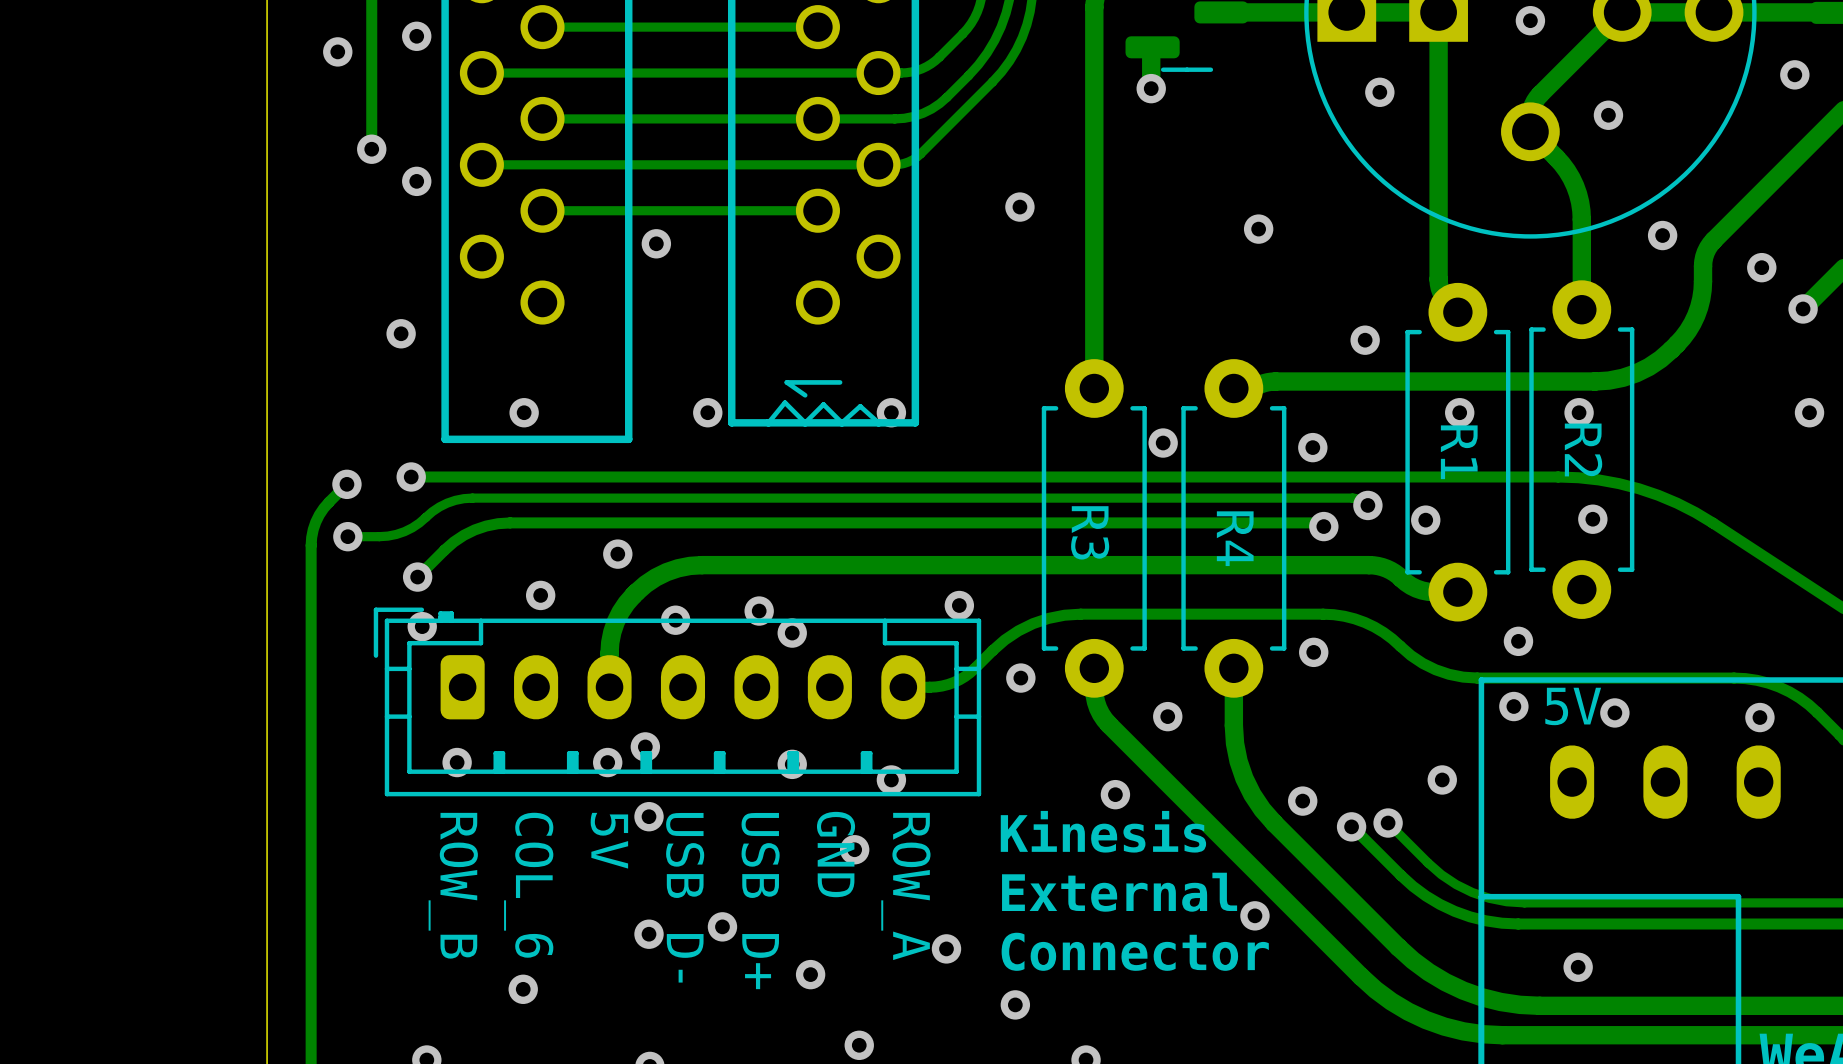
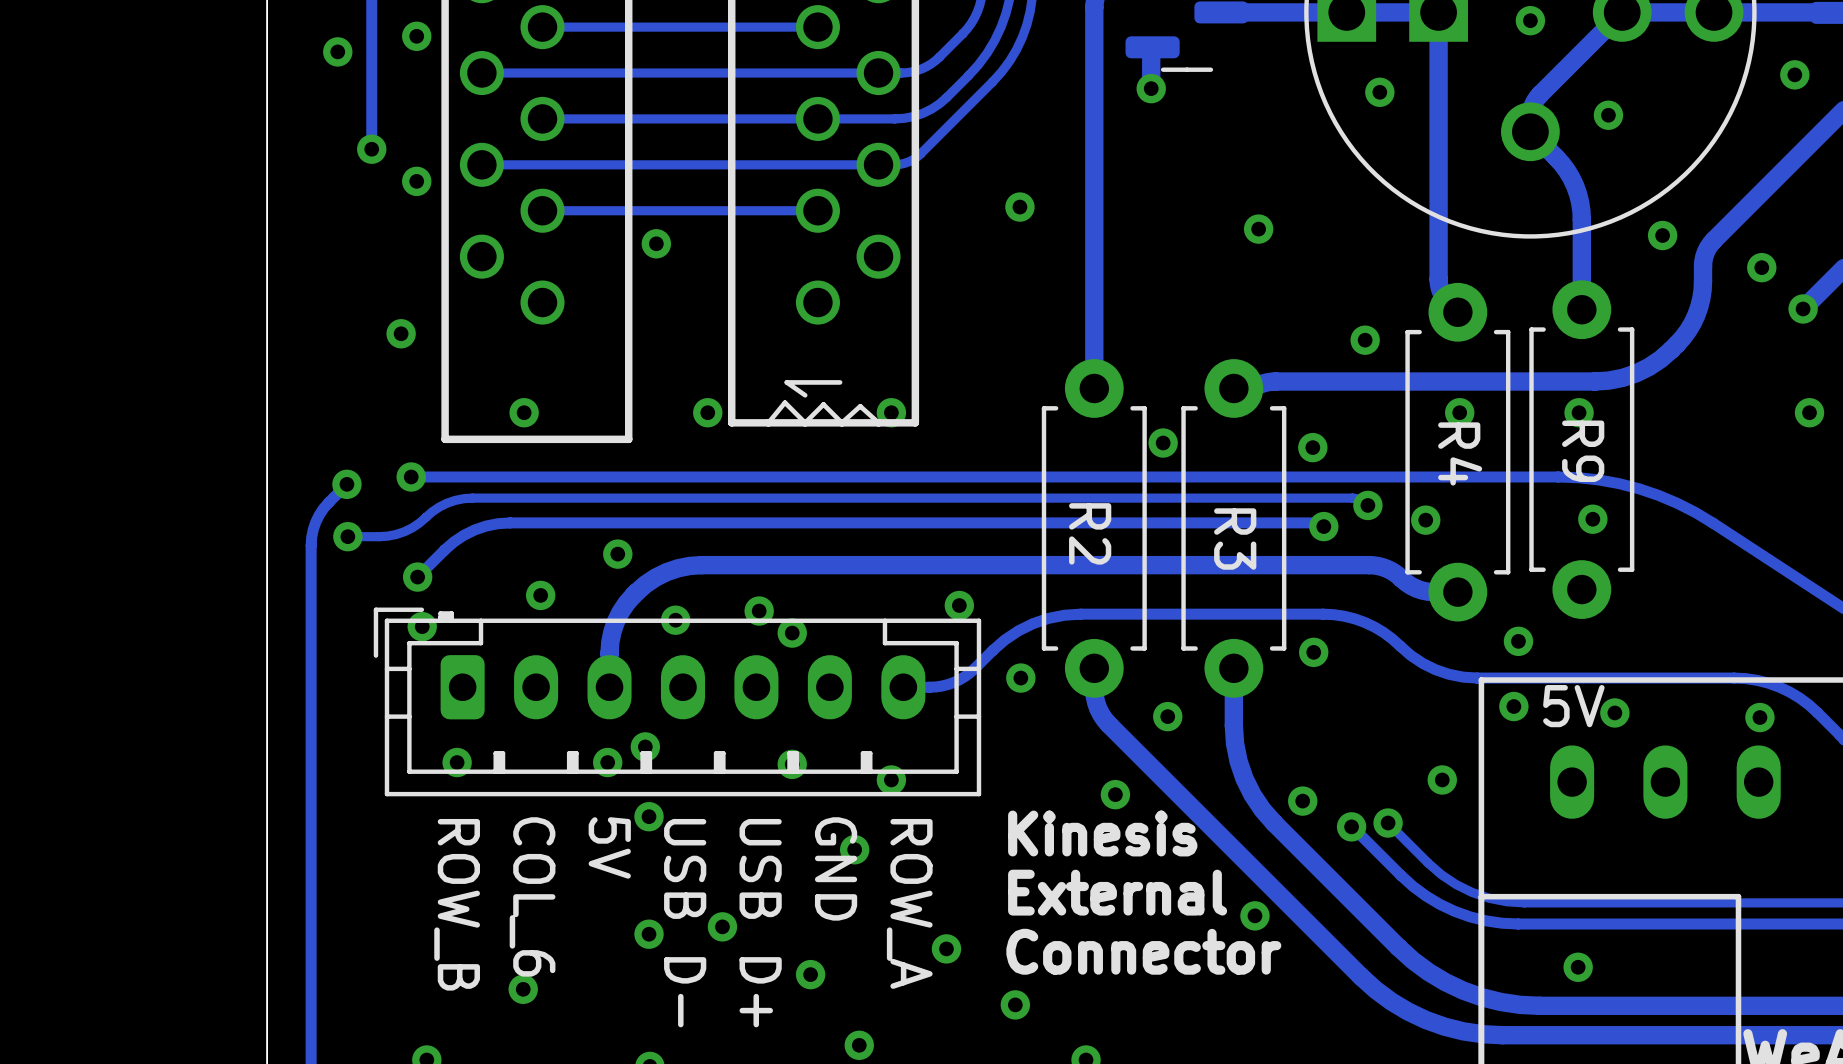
R2 name: R2 (1583, 449) -> R9 (1583, 451)
R1 name: R1 (1459, 452) -> R4 (1460, 453)
R3 name: R3 (1090, 532) -> R2 (1090, 533)
R4 name: R4 (1235, 538) -> R3 (1235, 539)

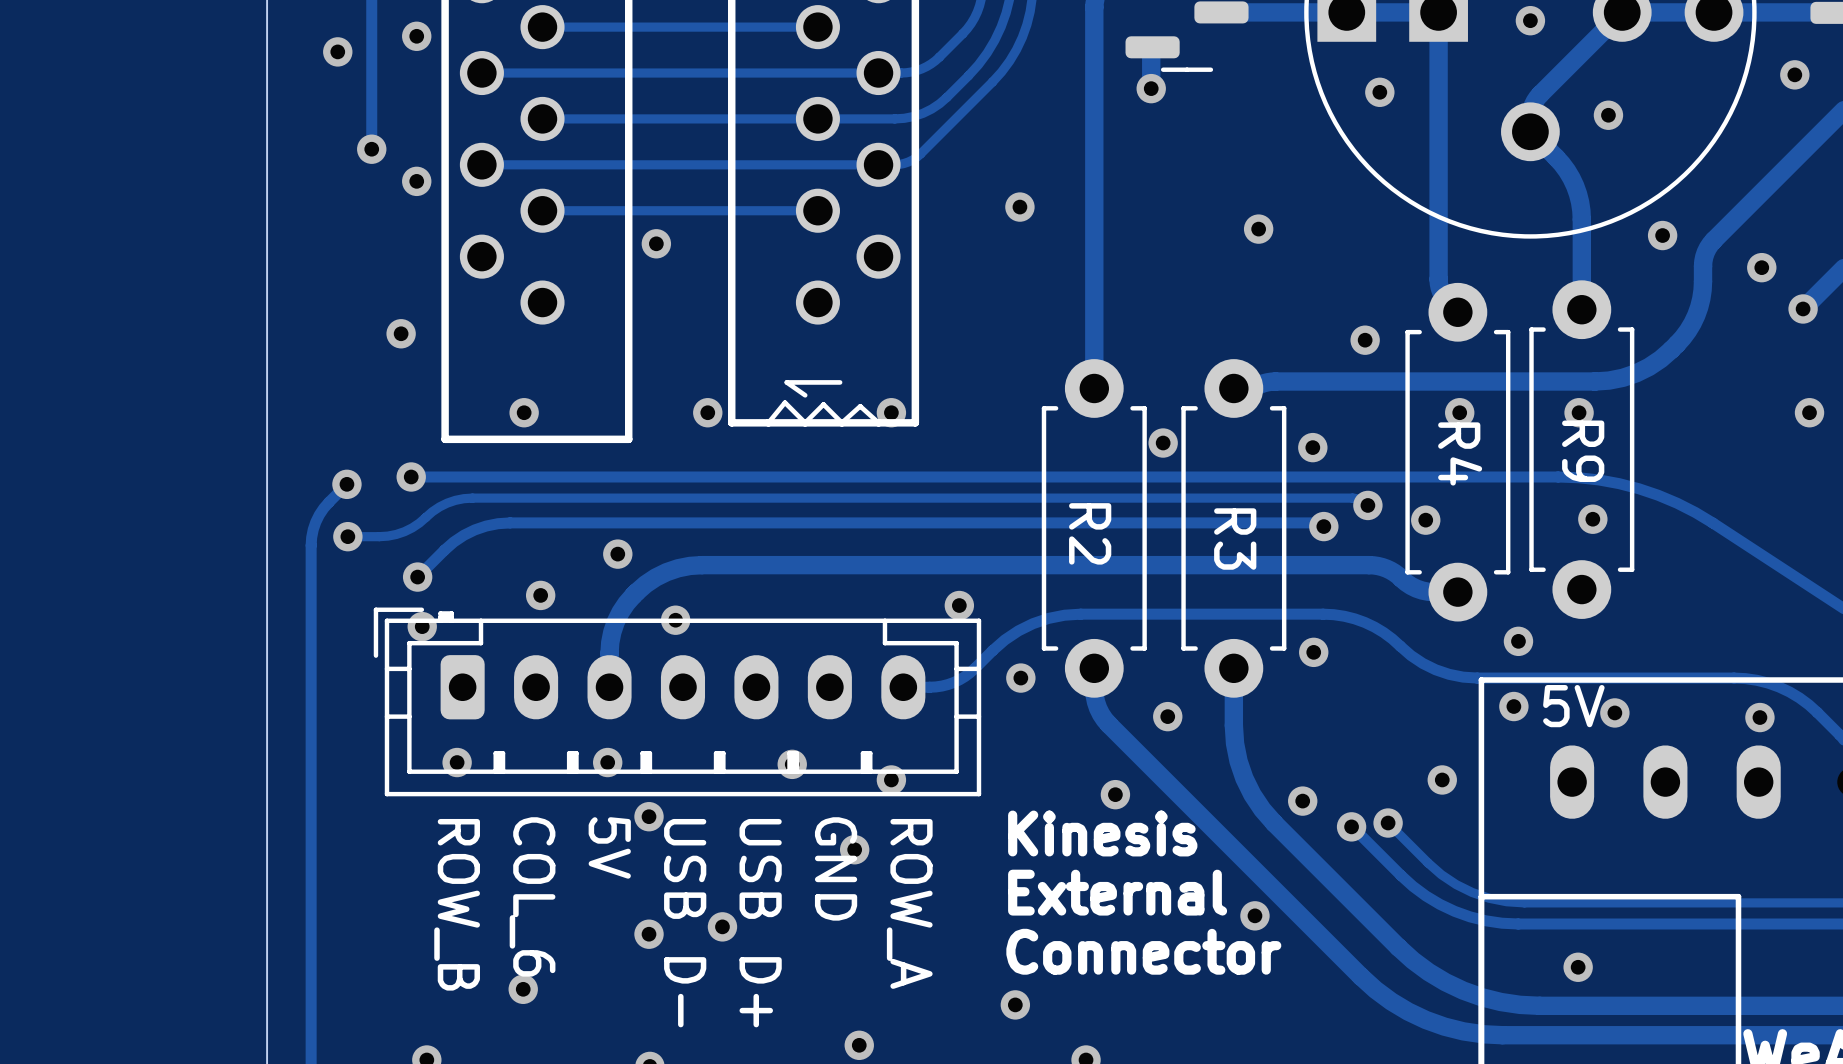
via: (759, 611) -> none
via: (792, 633) -> none
via: (645, 746) -> none
via: (946, 948) -> none
via: (810, 974) -> none

